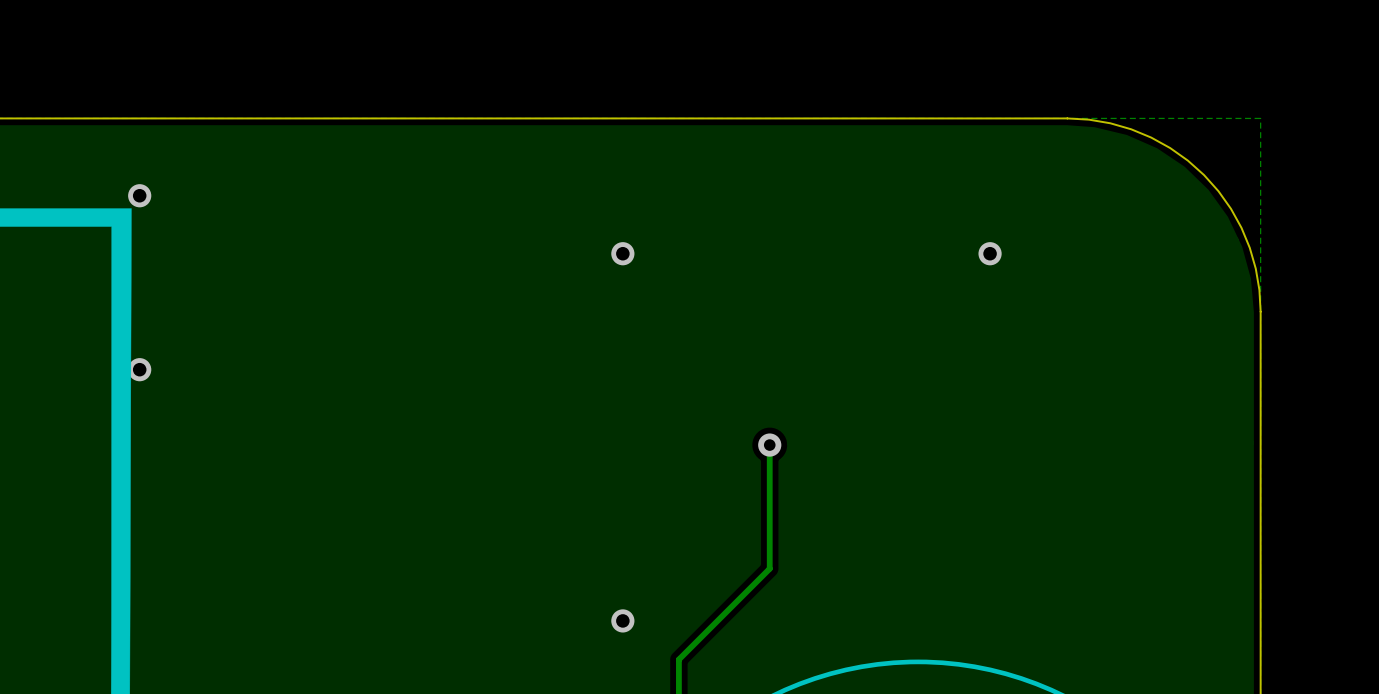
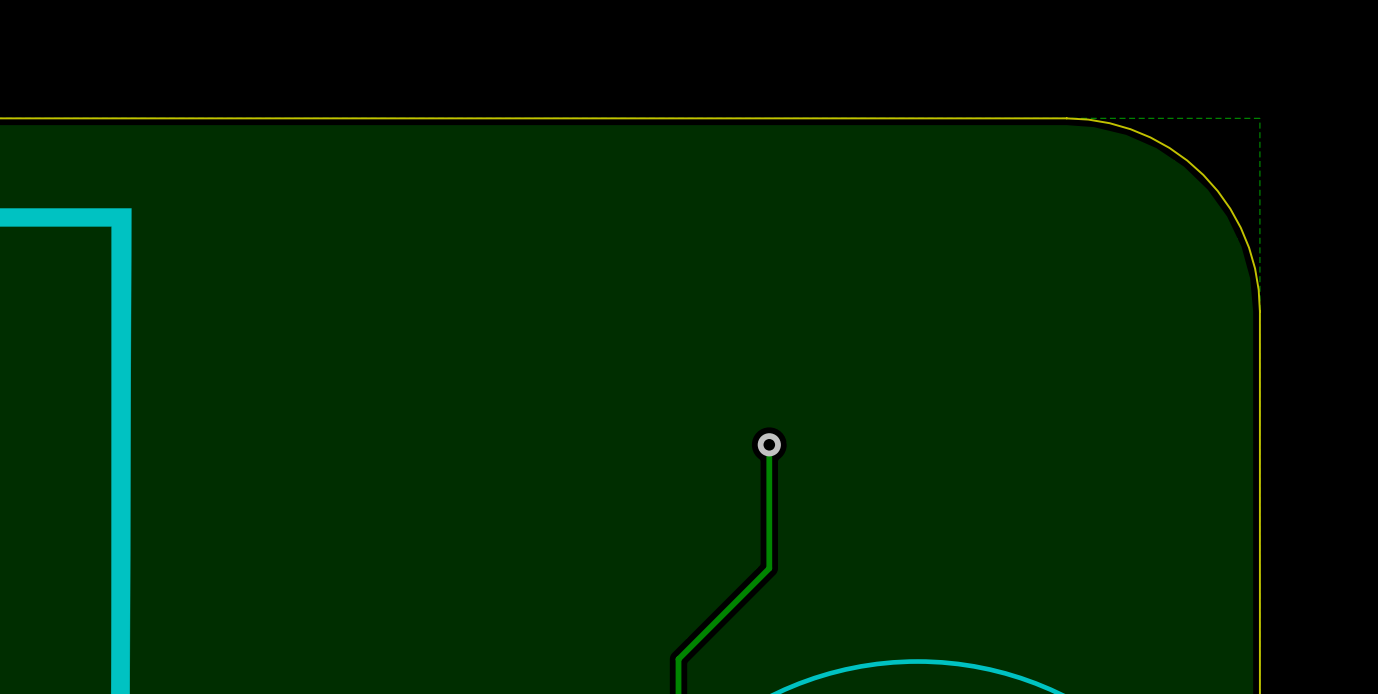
via: (139, 195) -> none
via: (622, 253) -> none
via: (990, 253) -> none
via: (139, 369) -> none
via: (622, 620) -> none

